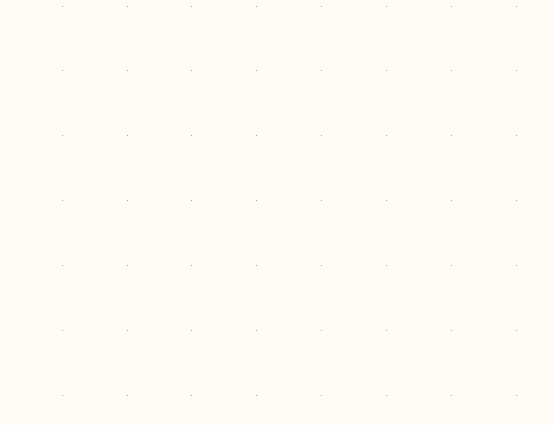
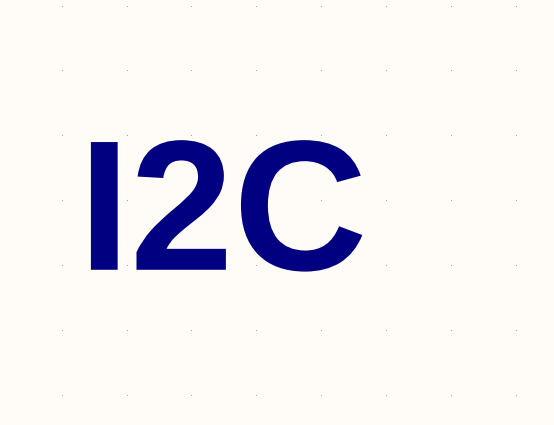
text: none -> I2C (226, 205)

